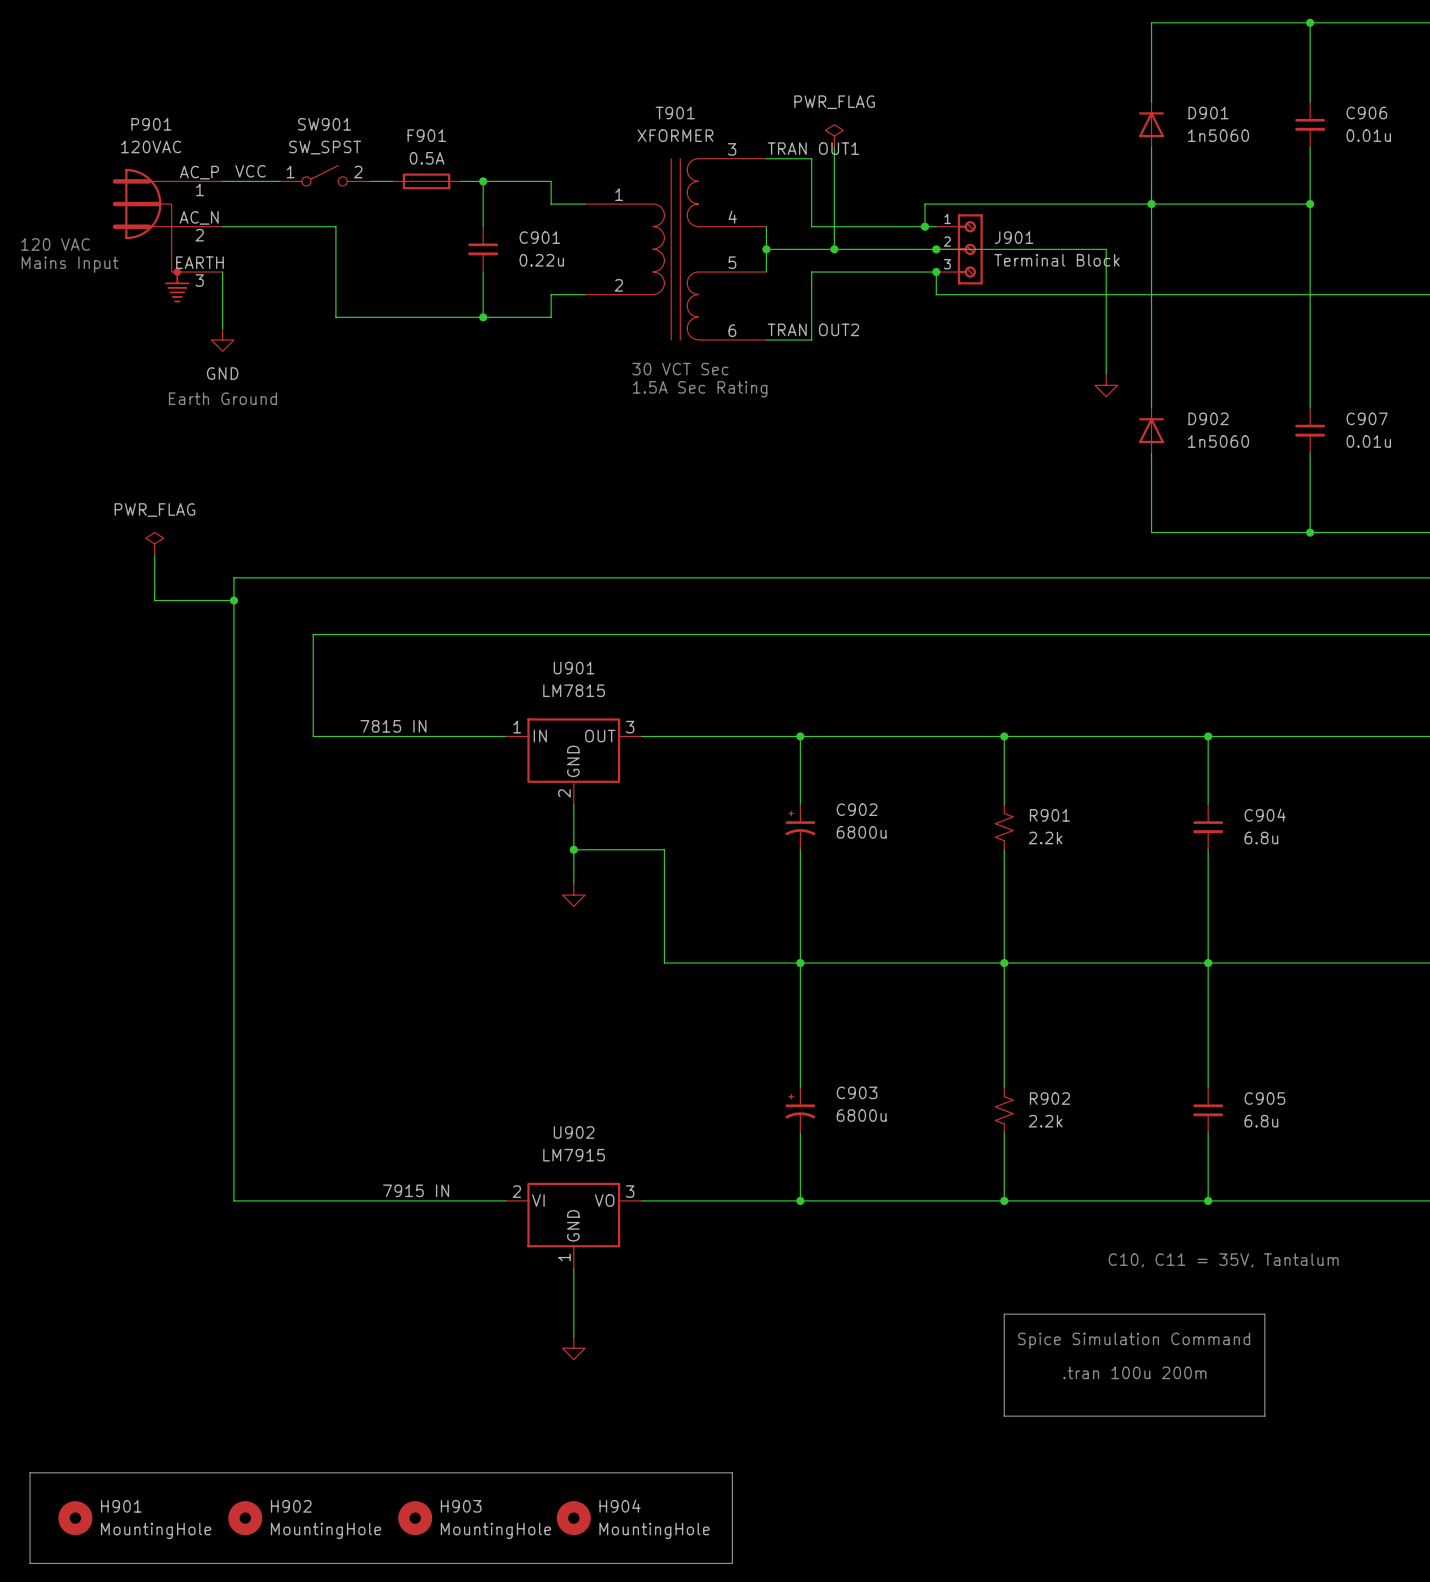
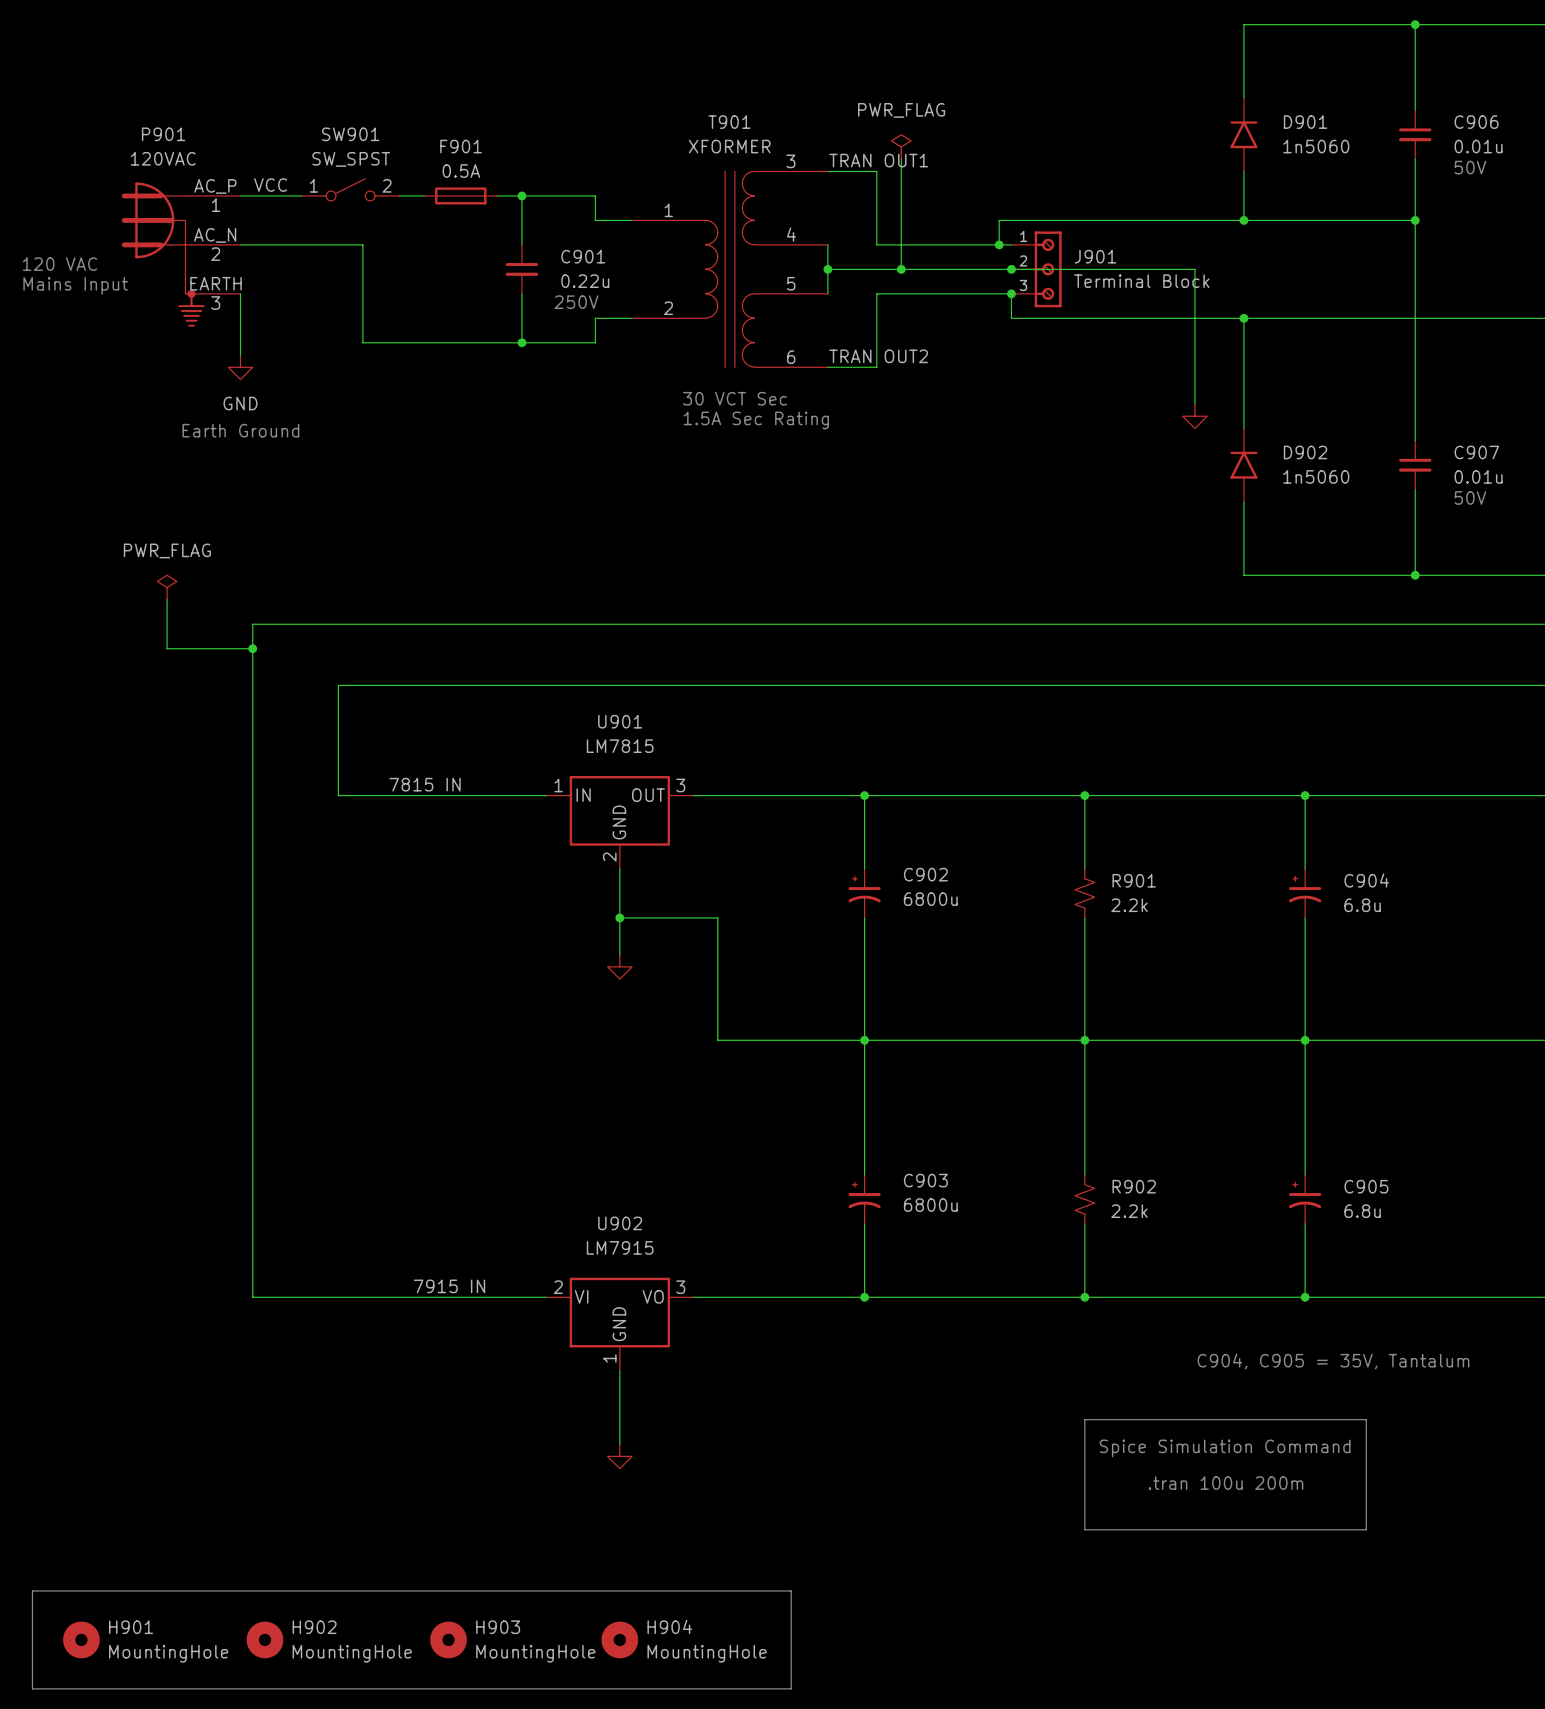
D901 symbol: [1139, 102, 1164, 148] -> [1230, 98, 1258, 172]
text: none -> 50V (1470, 167)
wire: (1151, 204) (1151, 294) -> none
text: none -> 250V (576, 302)
junction: none -> (1243, 318)
D902 symbol: [1139, 407, 1164, 454] -> [1230, 428, 1258, 502]
text: none -> 50V (1470, 497)
C904 symbol: [1193, 804, 1224, 850] -> [1288, 868, 1322, 918]
C905 symbol: [1193, 1087, 1224, 1133] -> [1288, 1174, 1322, 1224]
text: C10, C11 = 35V, Tantalum (1223, 1260) -> C904, C905 = 35V, Tantalum (1333, 1361)

